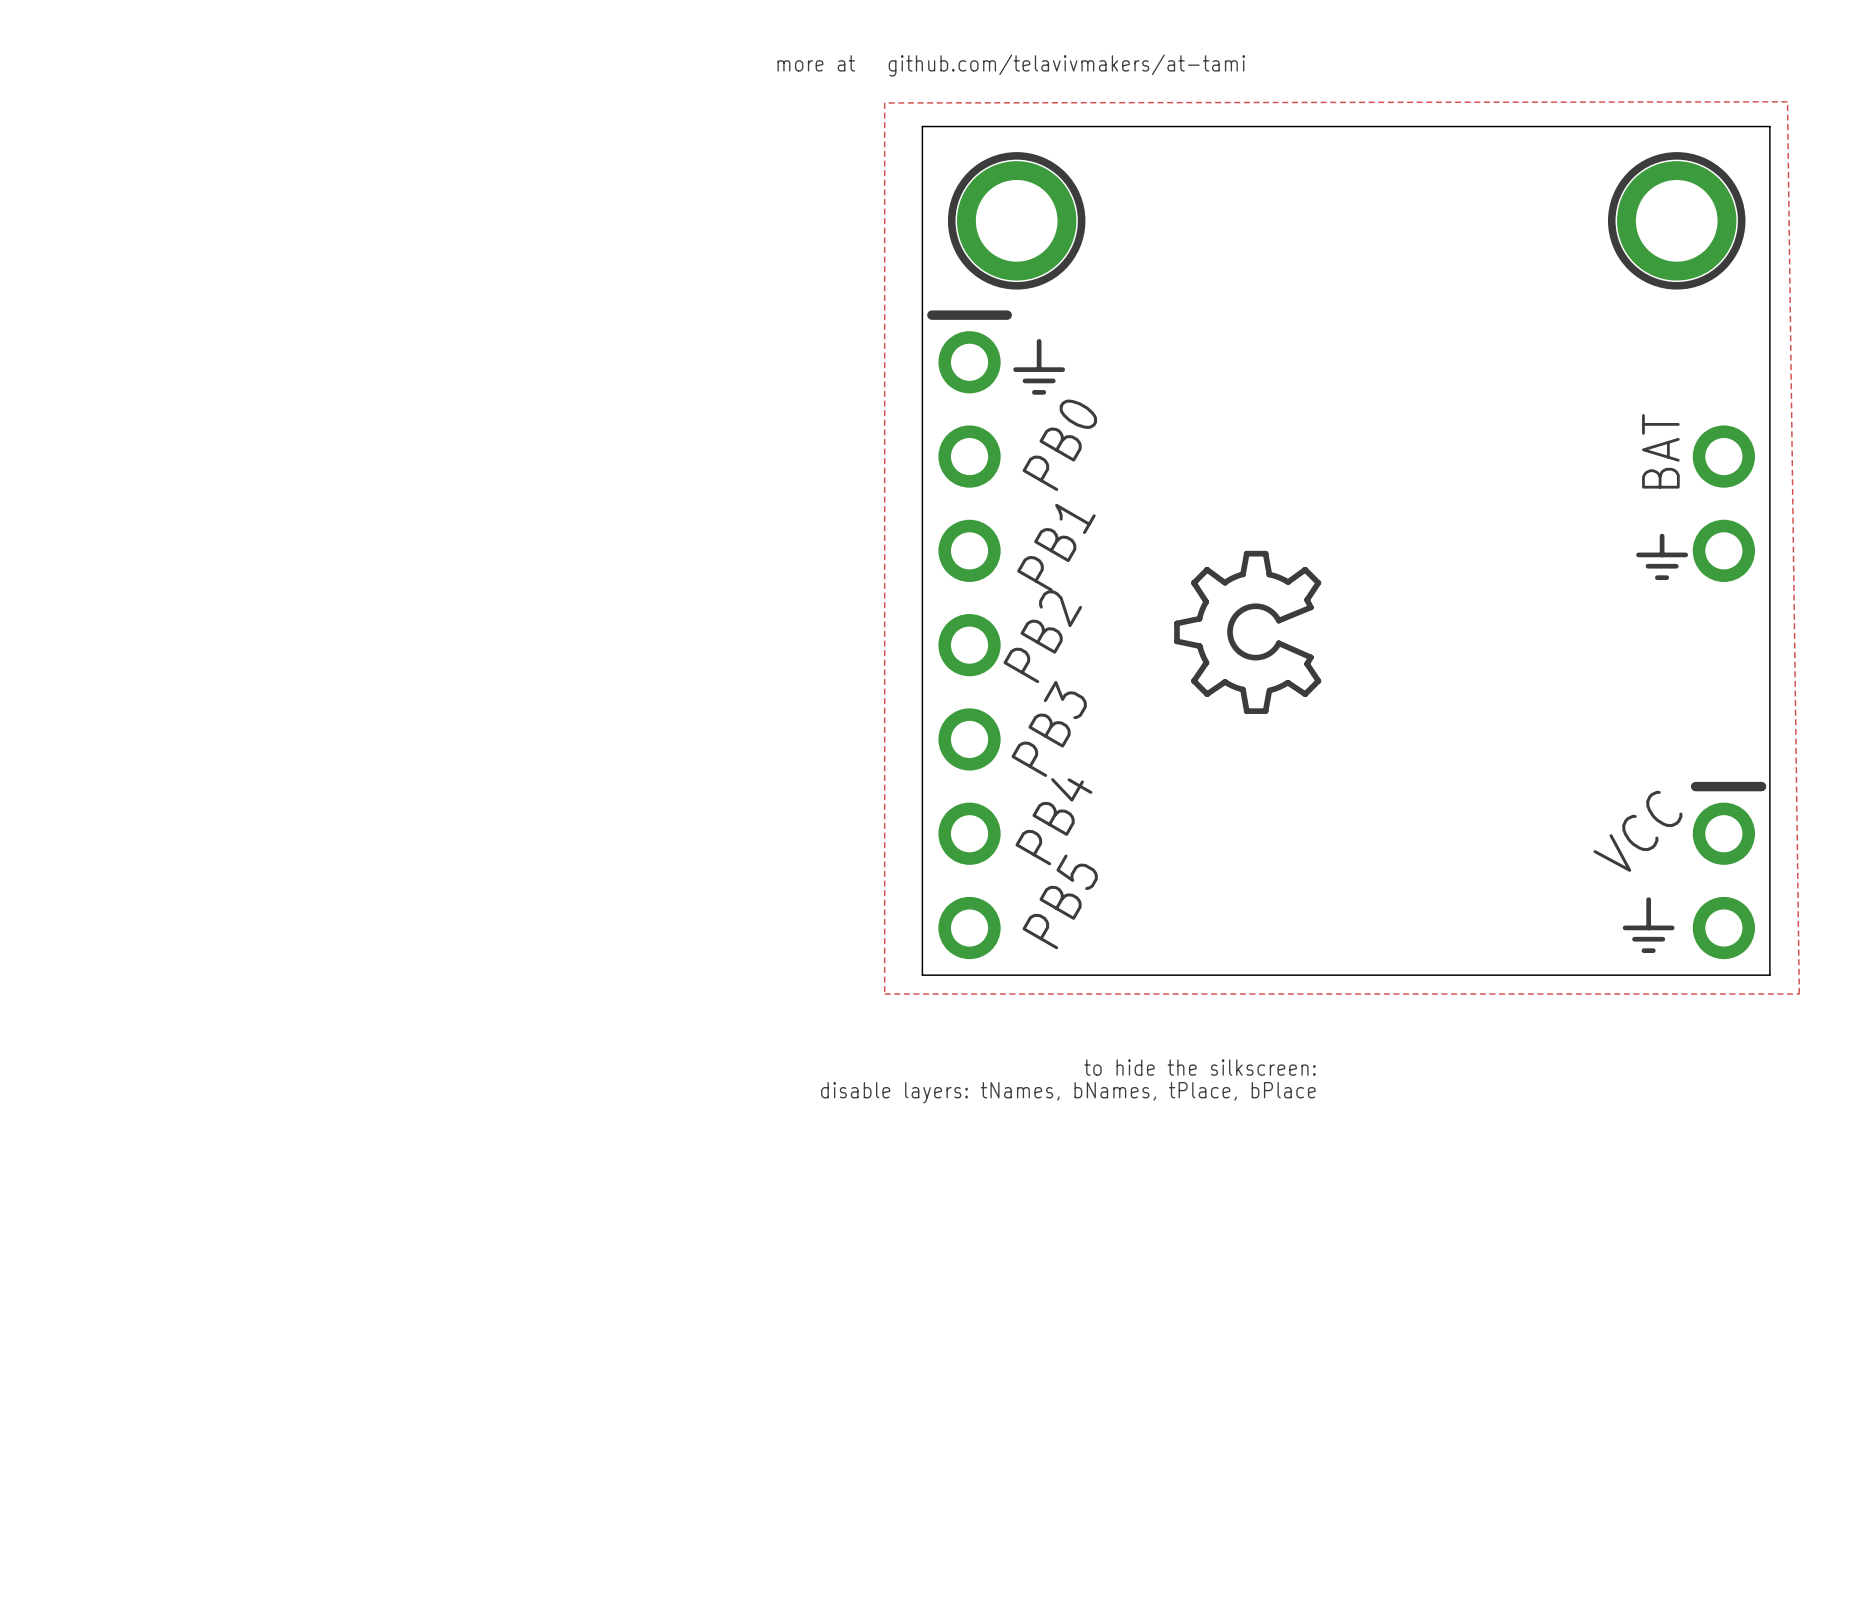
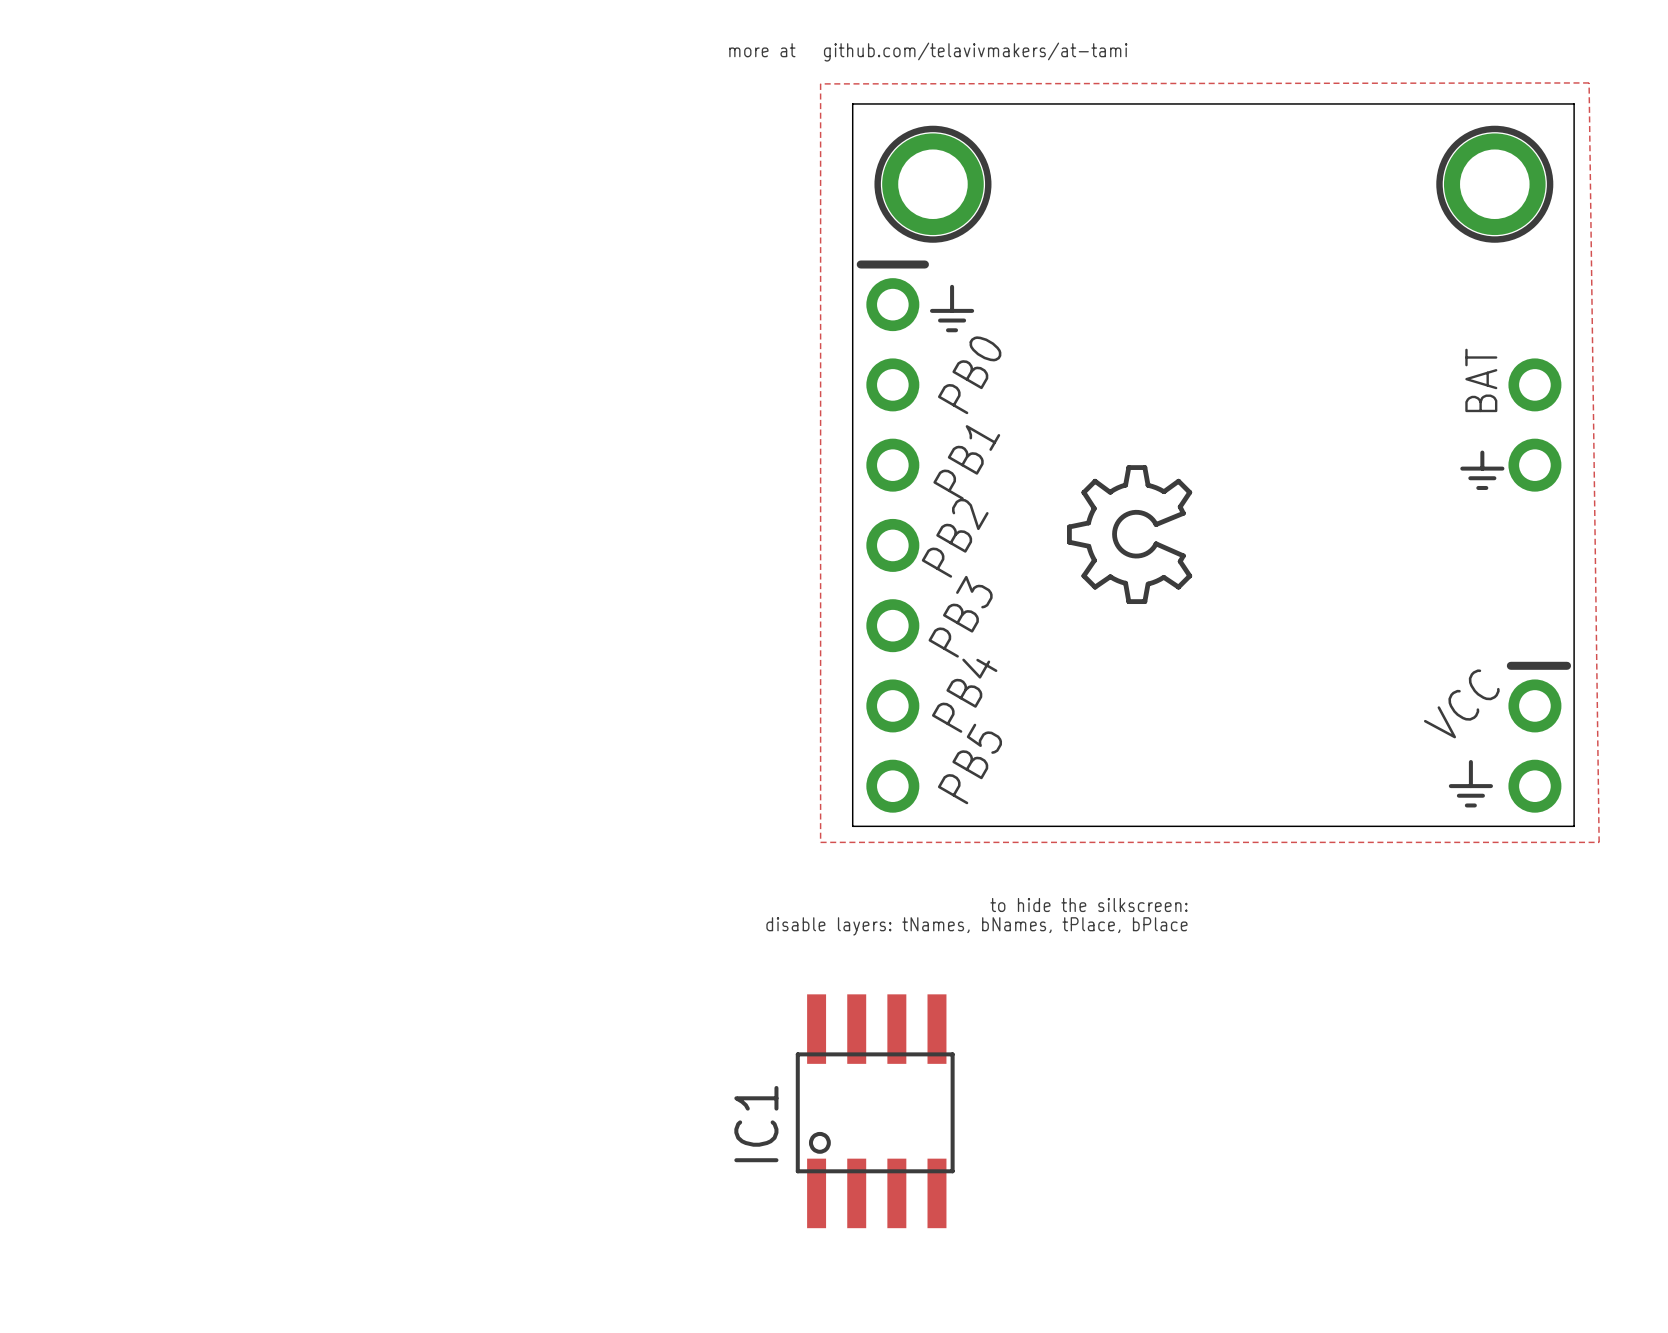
IC1: none -> (875, 1111)

